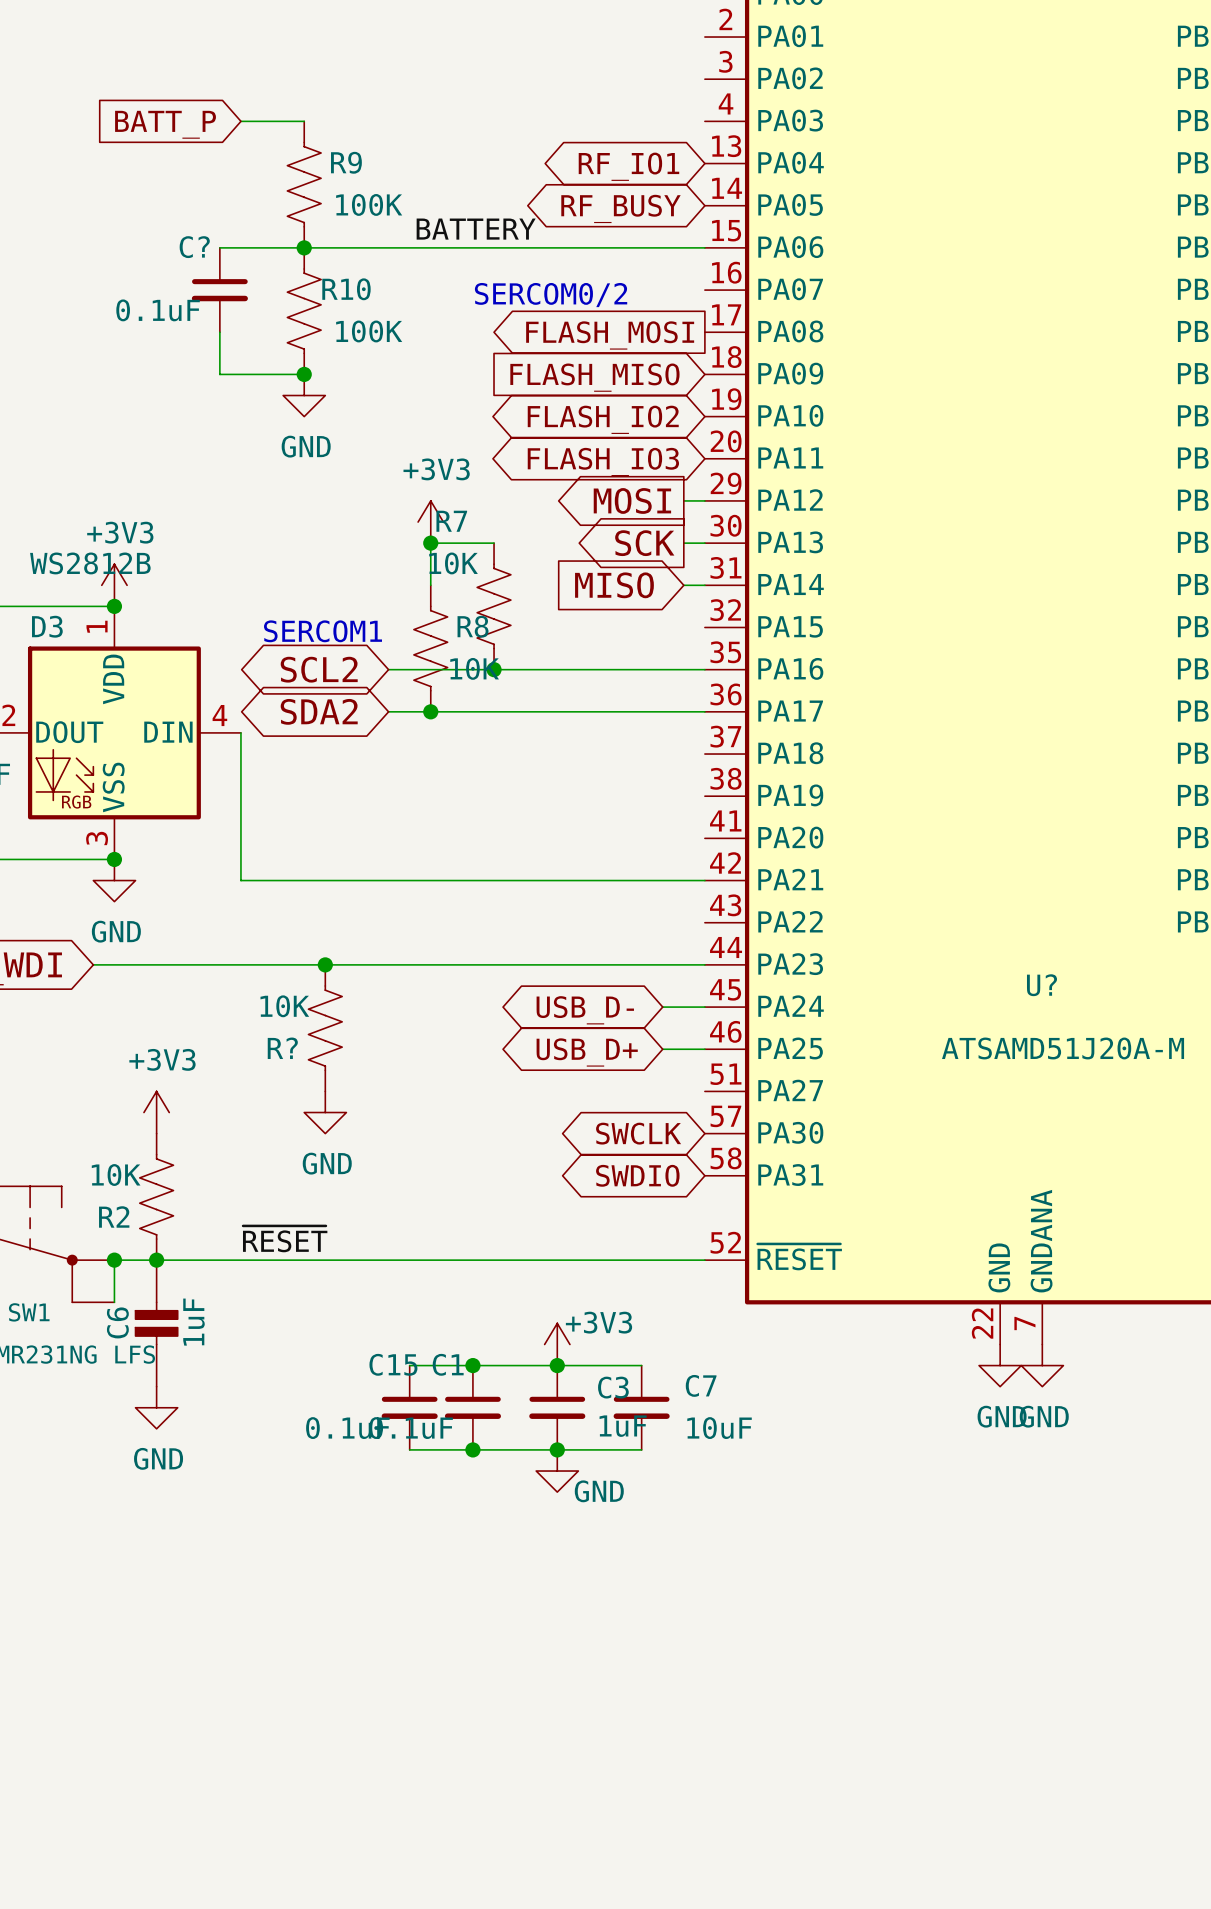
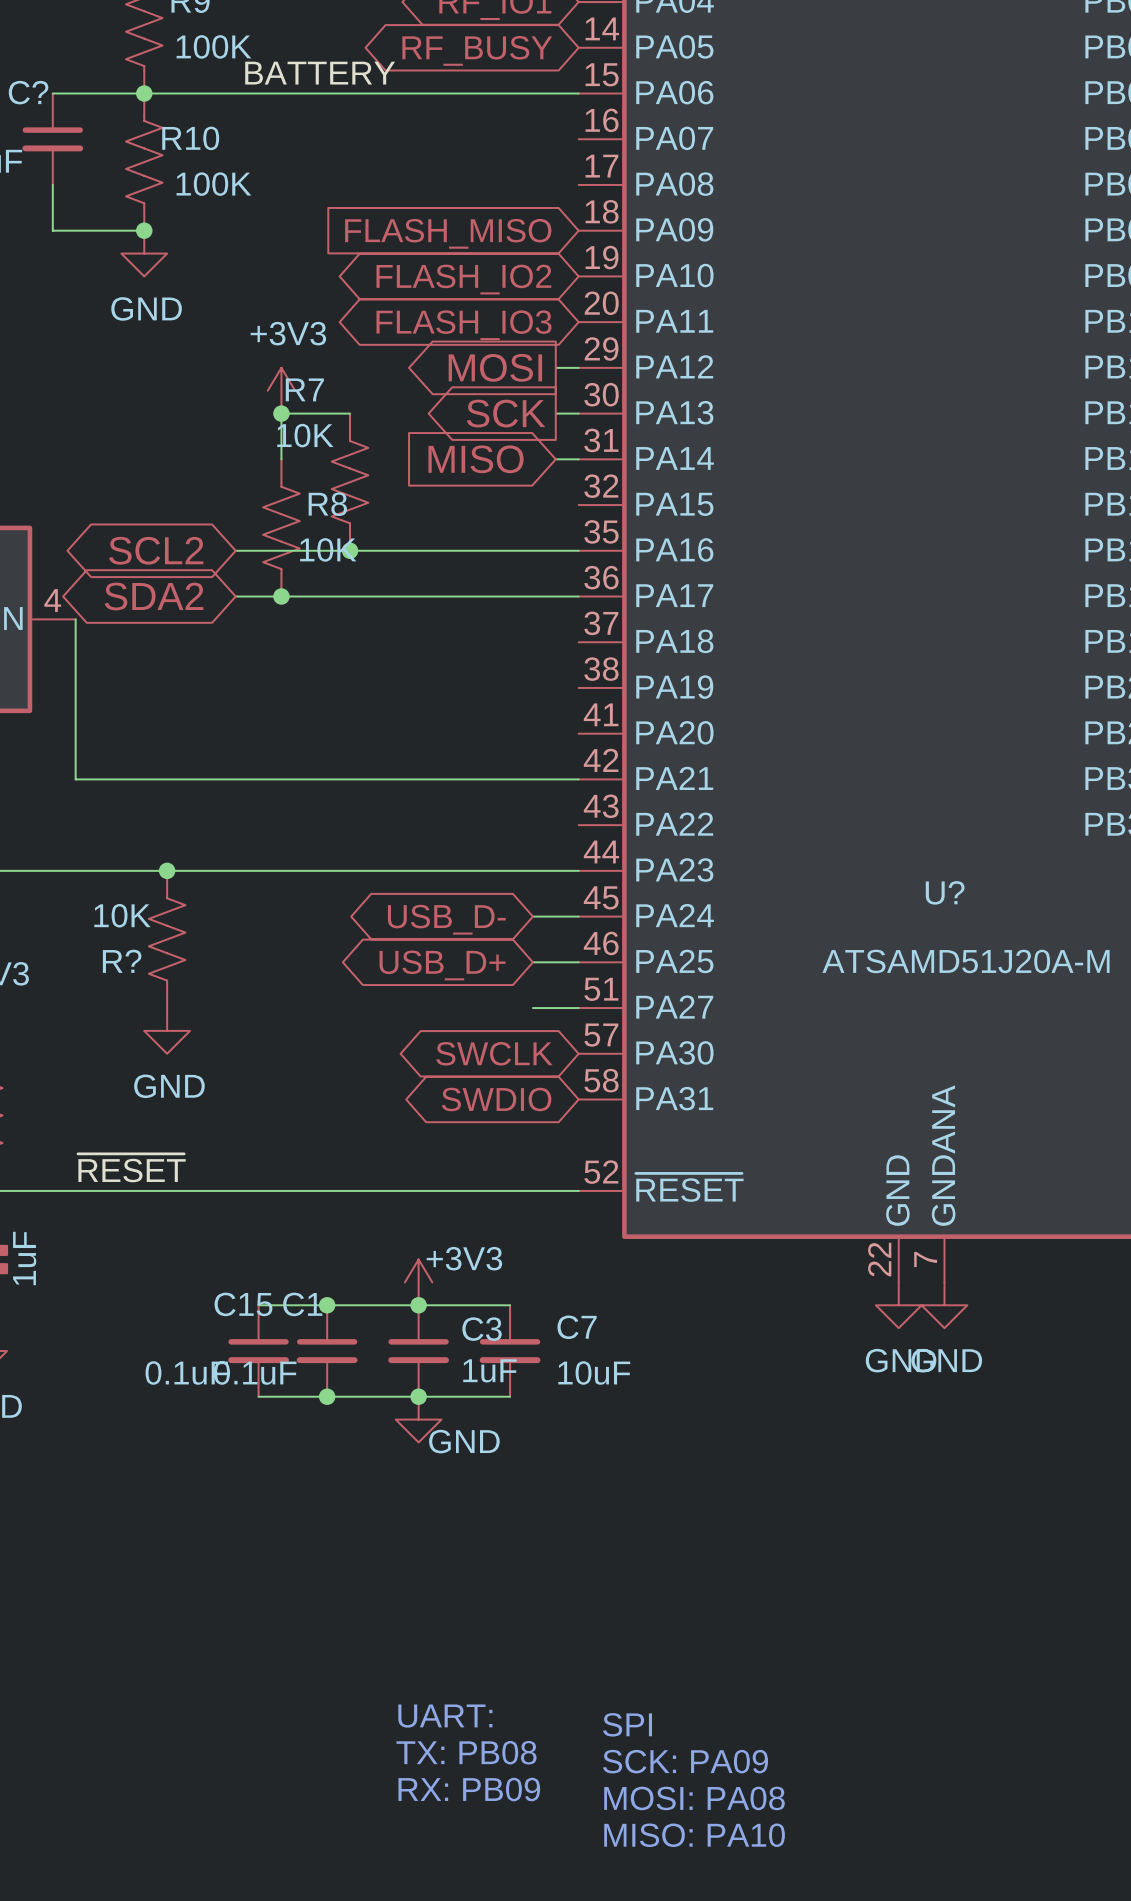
text: SERCOM0/2 (551, 295) -> none
global label: FLASH_MOSI (610, 335) -> none
text: SERCOM1 (323, 631) -> none
wire: none -> (532, 1008) (578, 1008)
text: none -> UART: (445, 1716)
text: none -> SPI (627, 1724)
text: none -> TX: PB08 (466, 1752)
text: none -> SCK: PA09 (685, 1761)
text: none -> RX: PB09 (469, 1789)
text: none -> MOSI: PA08 (694, 1798)
text: none -> MISO: PA10 (694, 1835)

